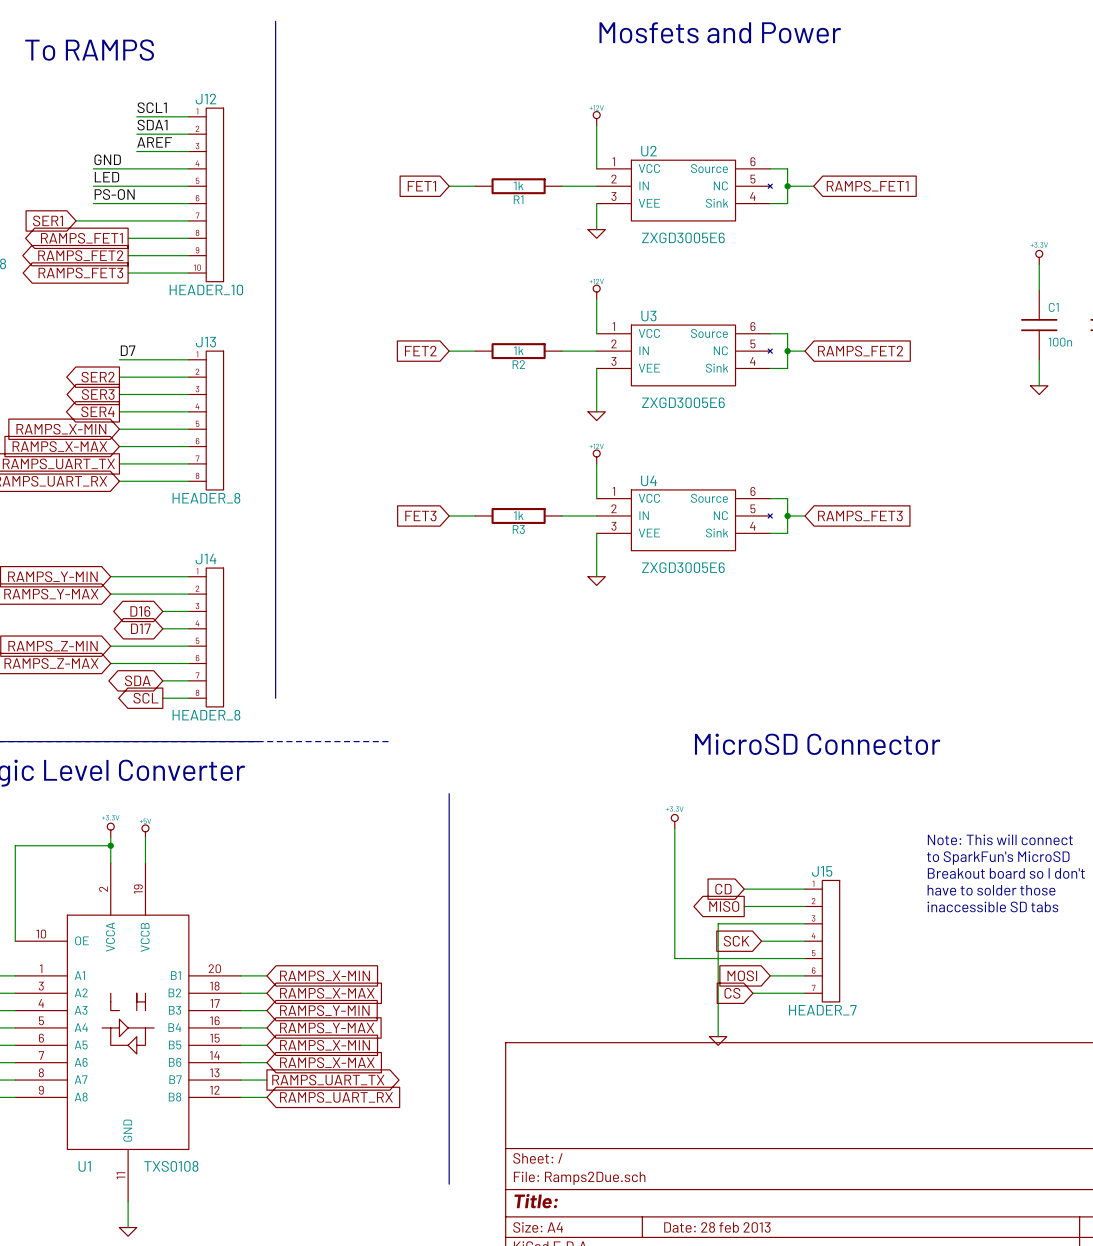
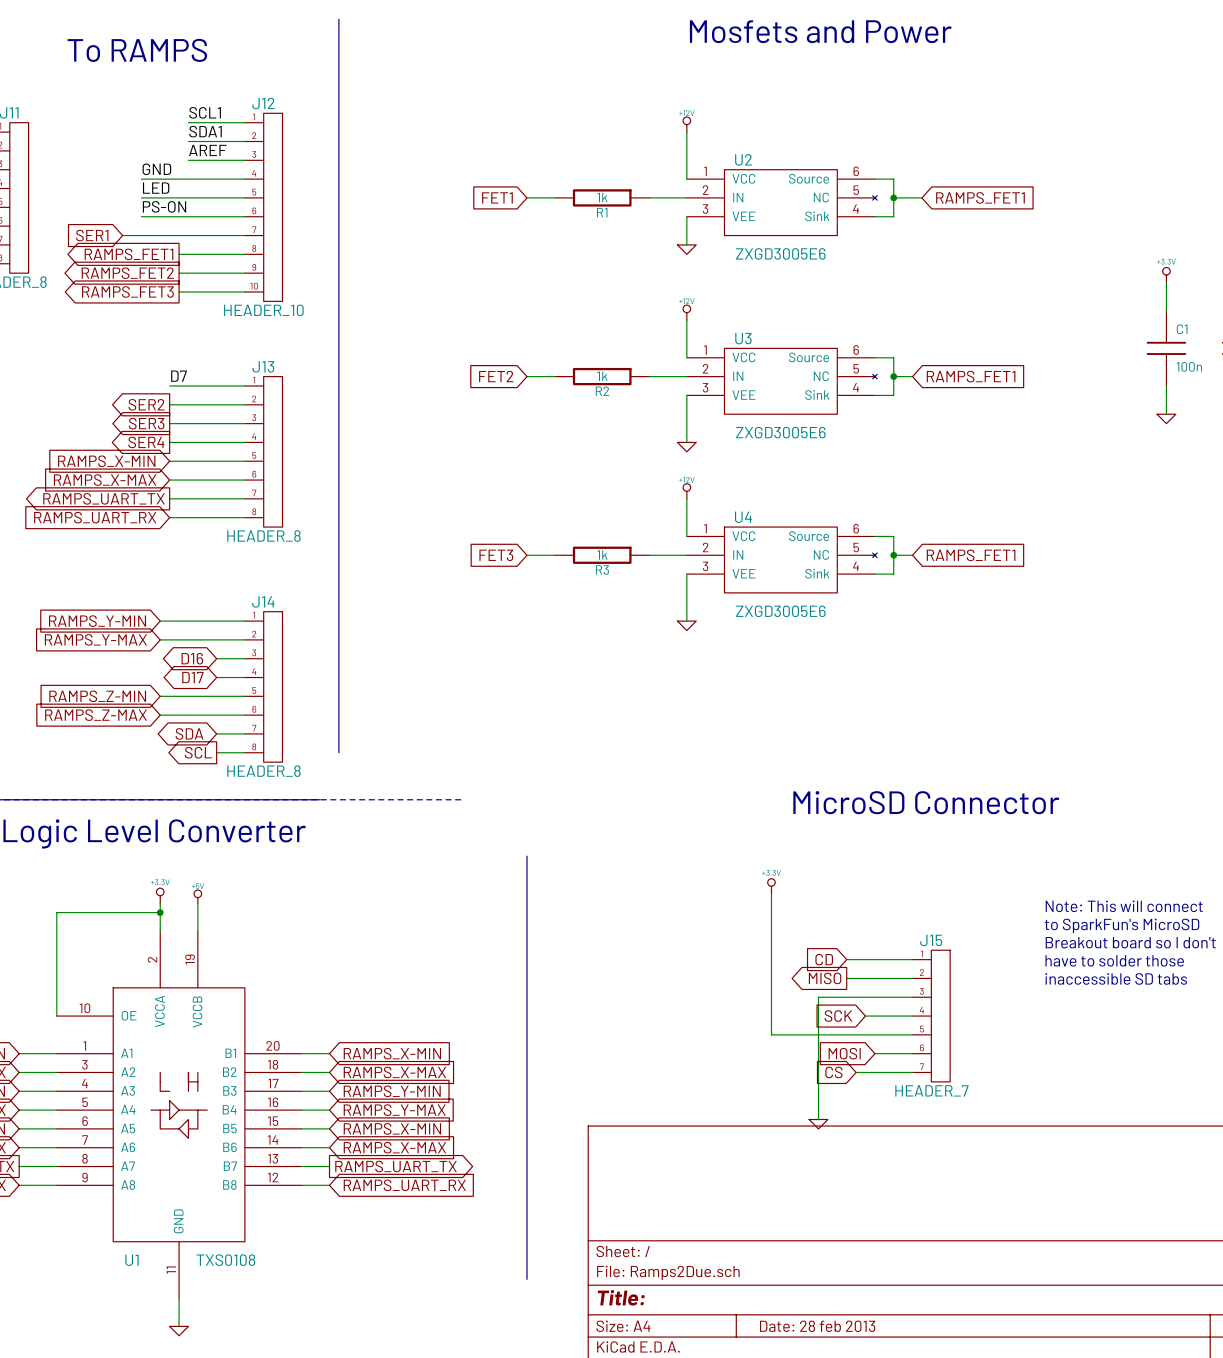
global label: RAMPS_FET2 (860, 351) -> RAMPS_FET1 (971, 376)
global label: RAMPS_FET3 (860, 515) -> RAMPS_FET1 (971, 555)

